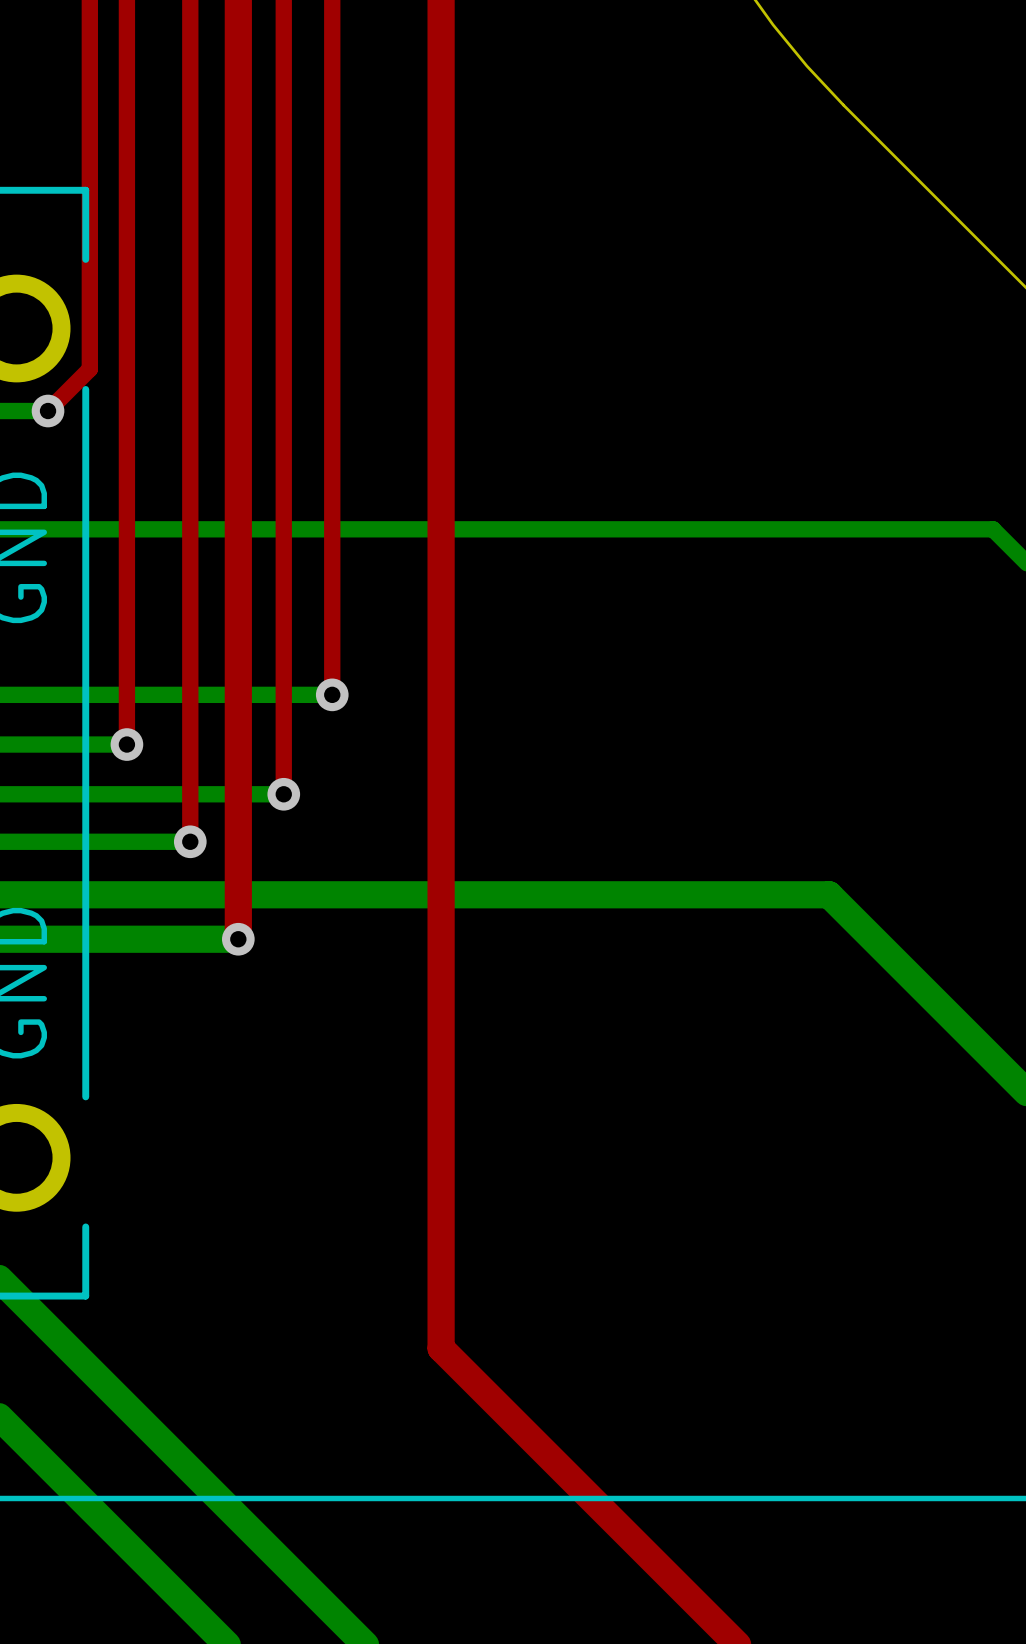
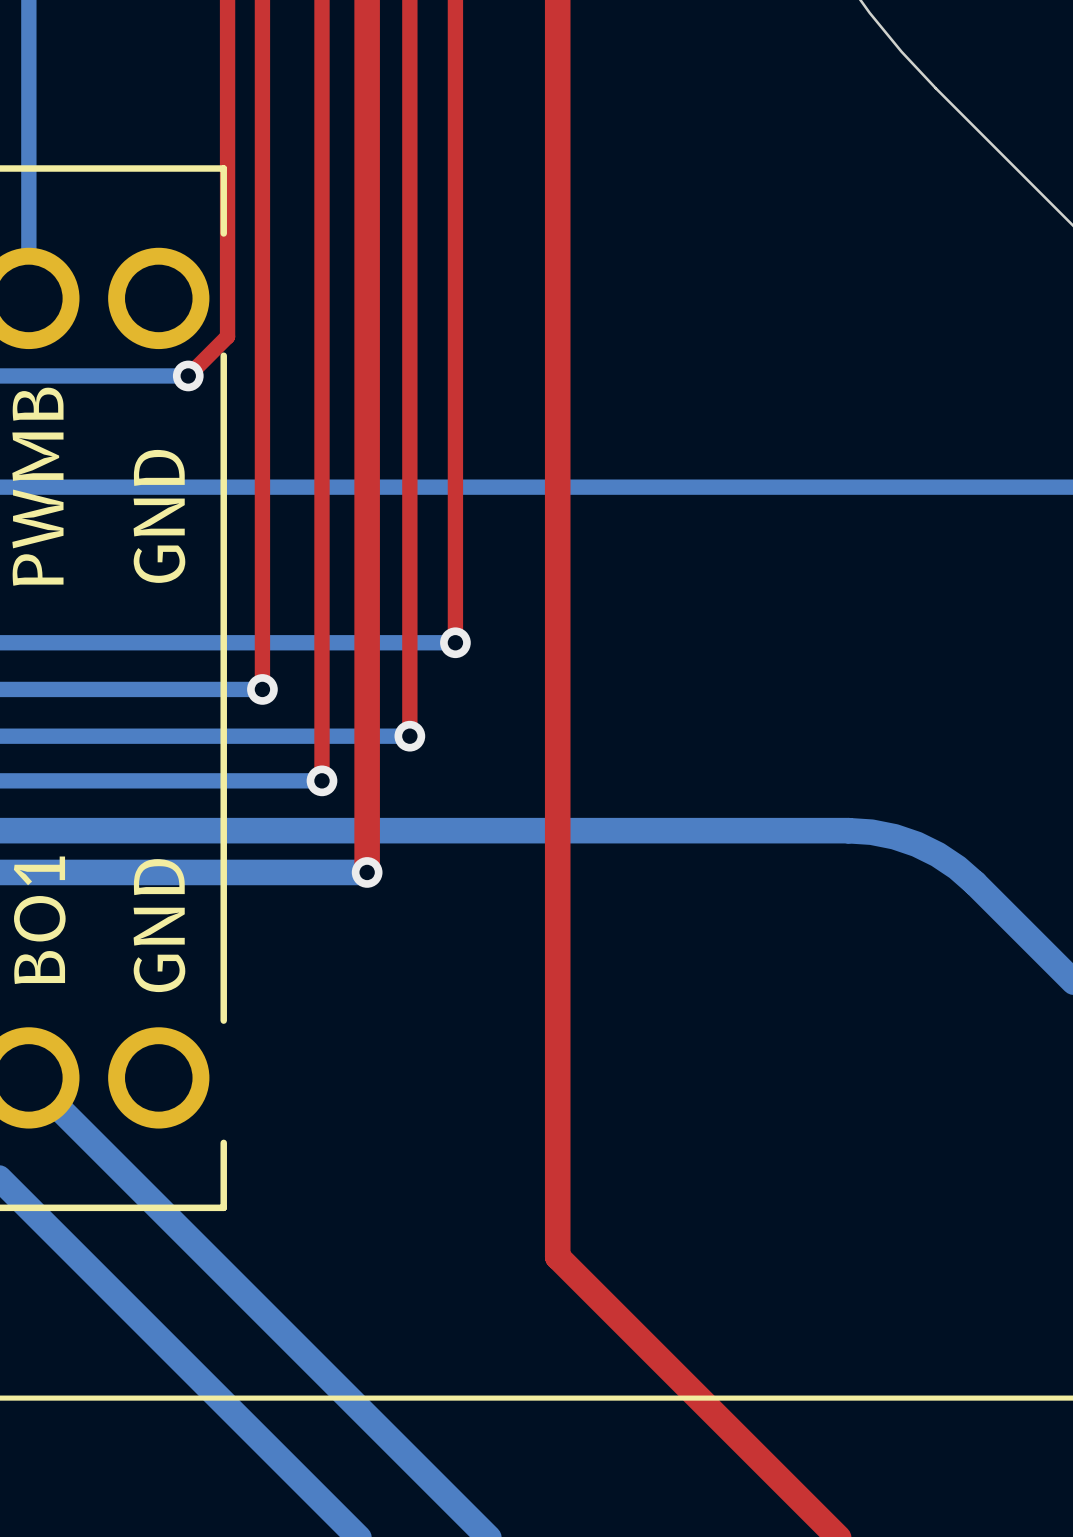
bottom track: (750, 894) (829, 894) (884, 950) -> (848, 830) (871, 832) (894, 836) (916, 844) (937, 854) (957, 867) (974, 883)

